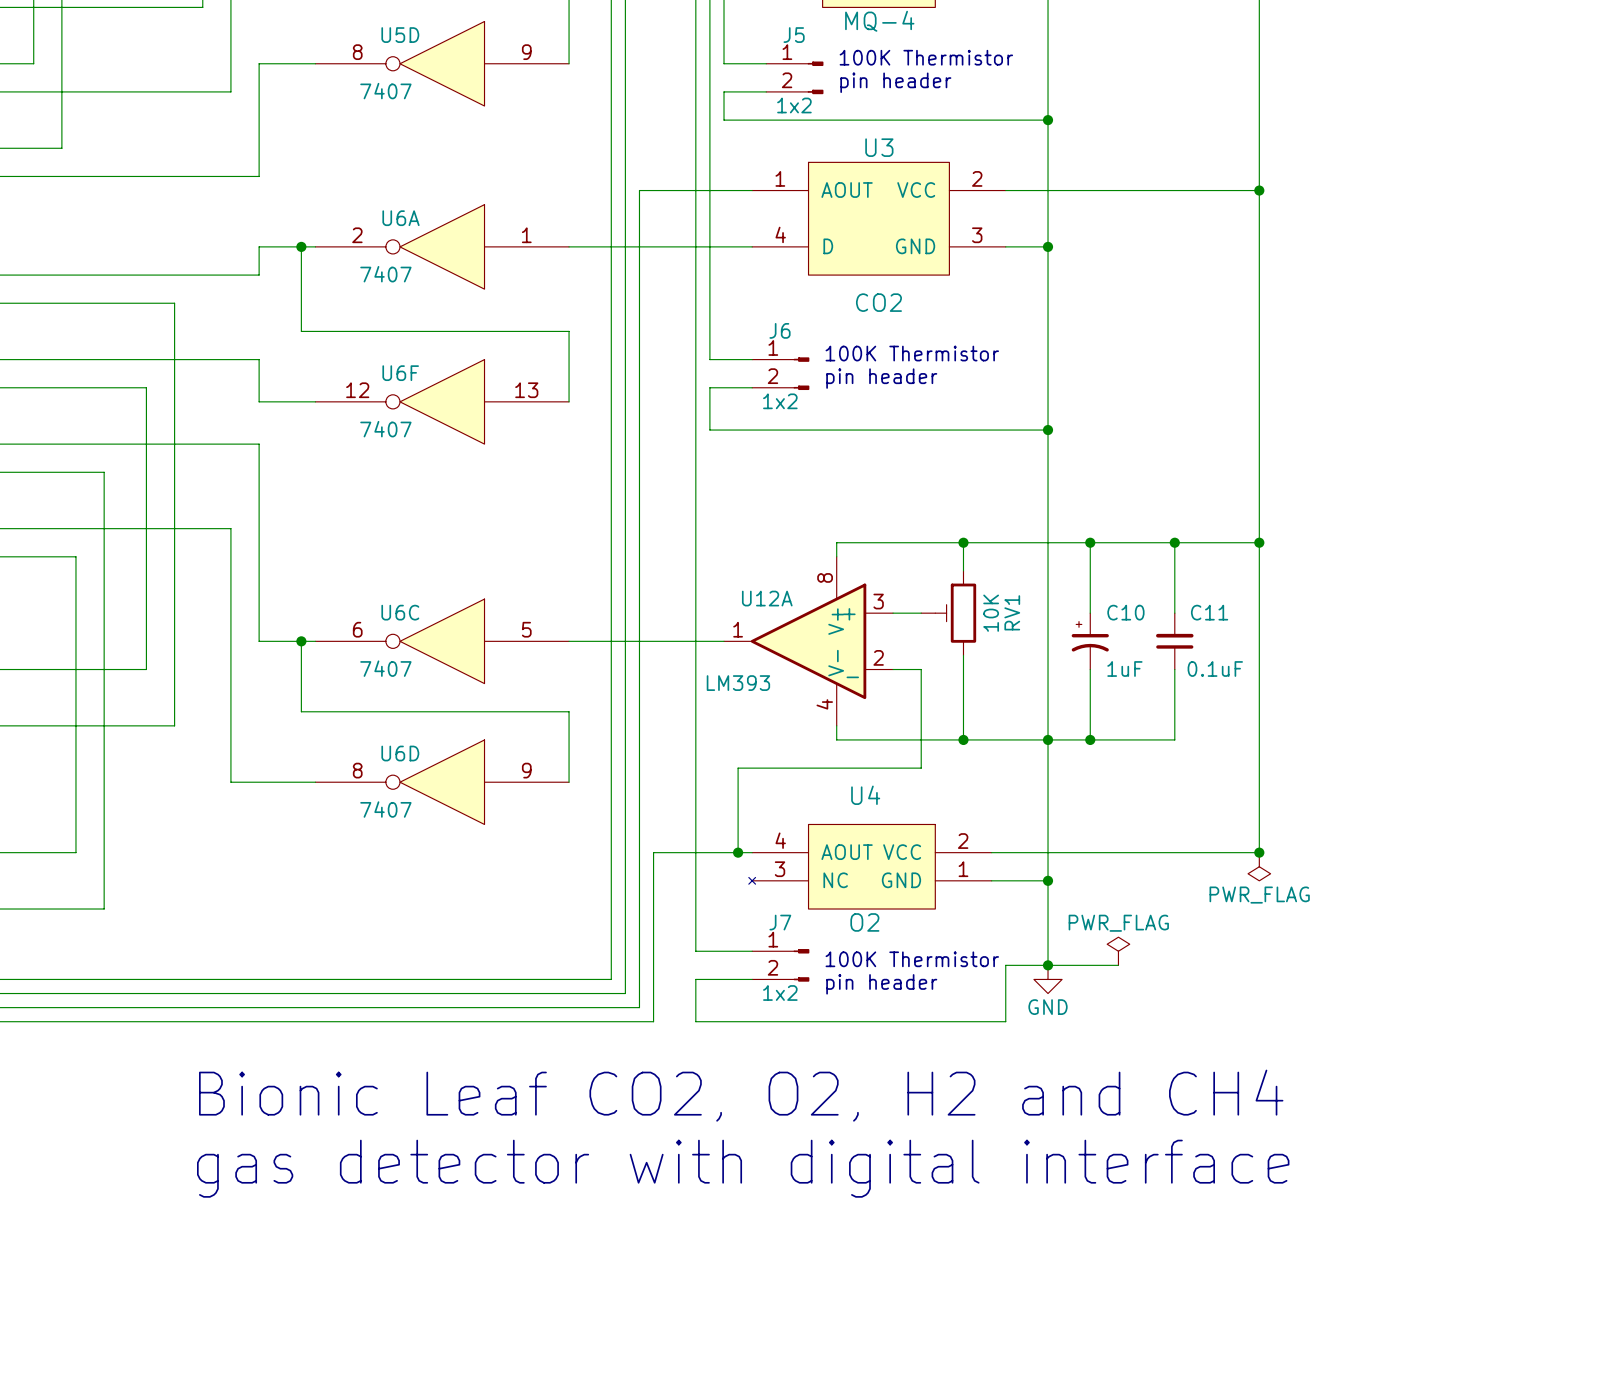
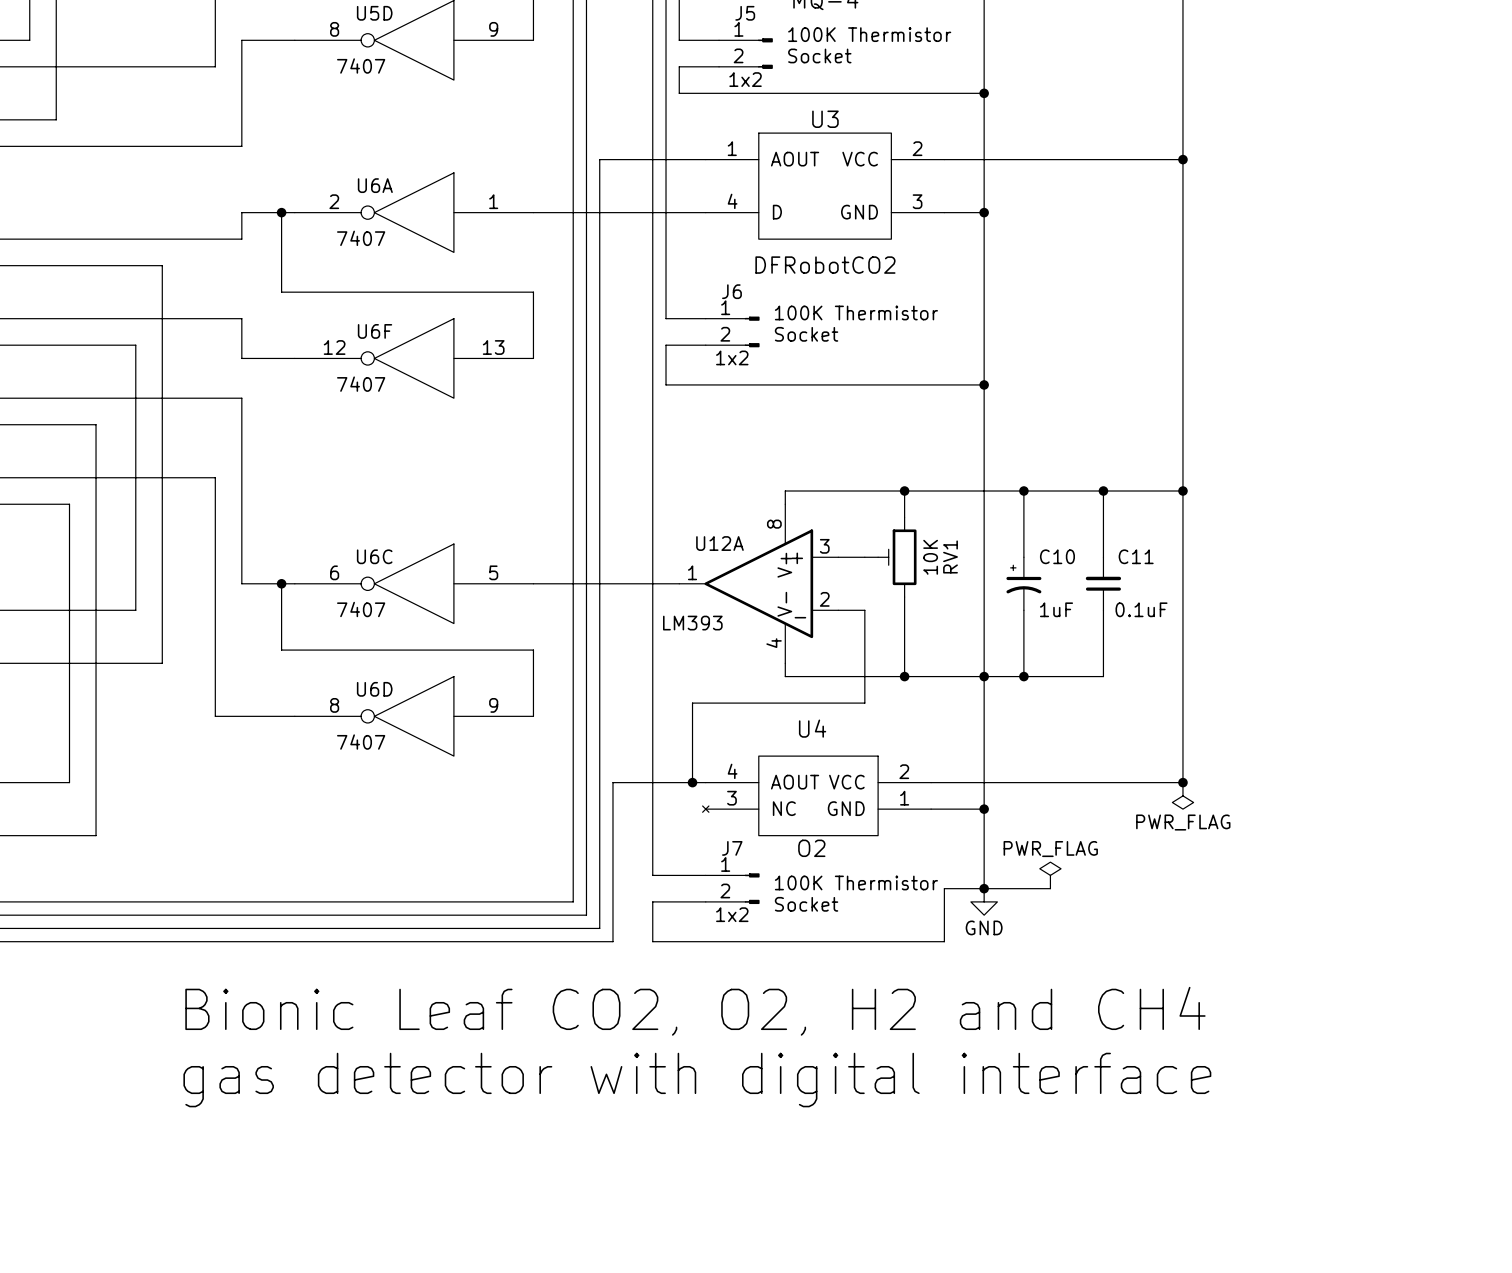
text: pin header (895, 82) -> Socket (819, 55)
U3 value: CO2 (878, 302) -> DFRobotCO2 (825, 265)
text: pin header (881, 378) -> Socket (806, 334)
text: pin header (881, 984) -> Socket (806, 904)

